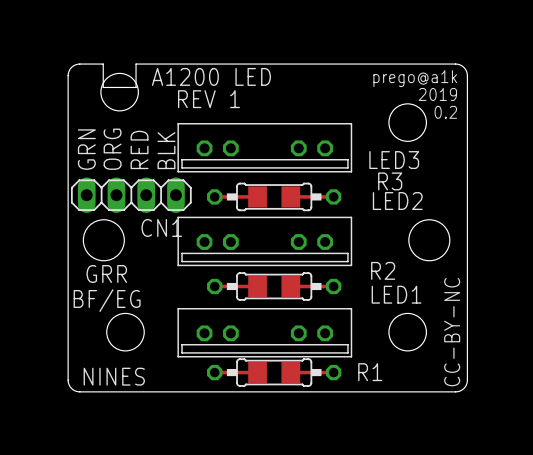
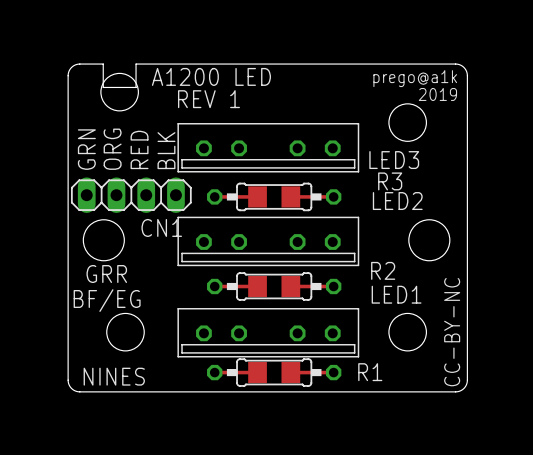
text: 0.2 (445, 112) -> none
part footprint: [177, 123, 353, 173] -> [177, 123, 360, 173]
part footprint: [177, 216, 353, 267] -> [177, 216, 360, 267]
part footprint: [177, 308, 353, 358] -> [177, 308, 360, 358]

